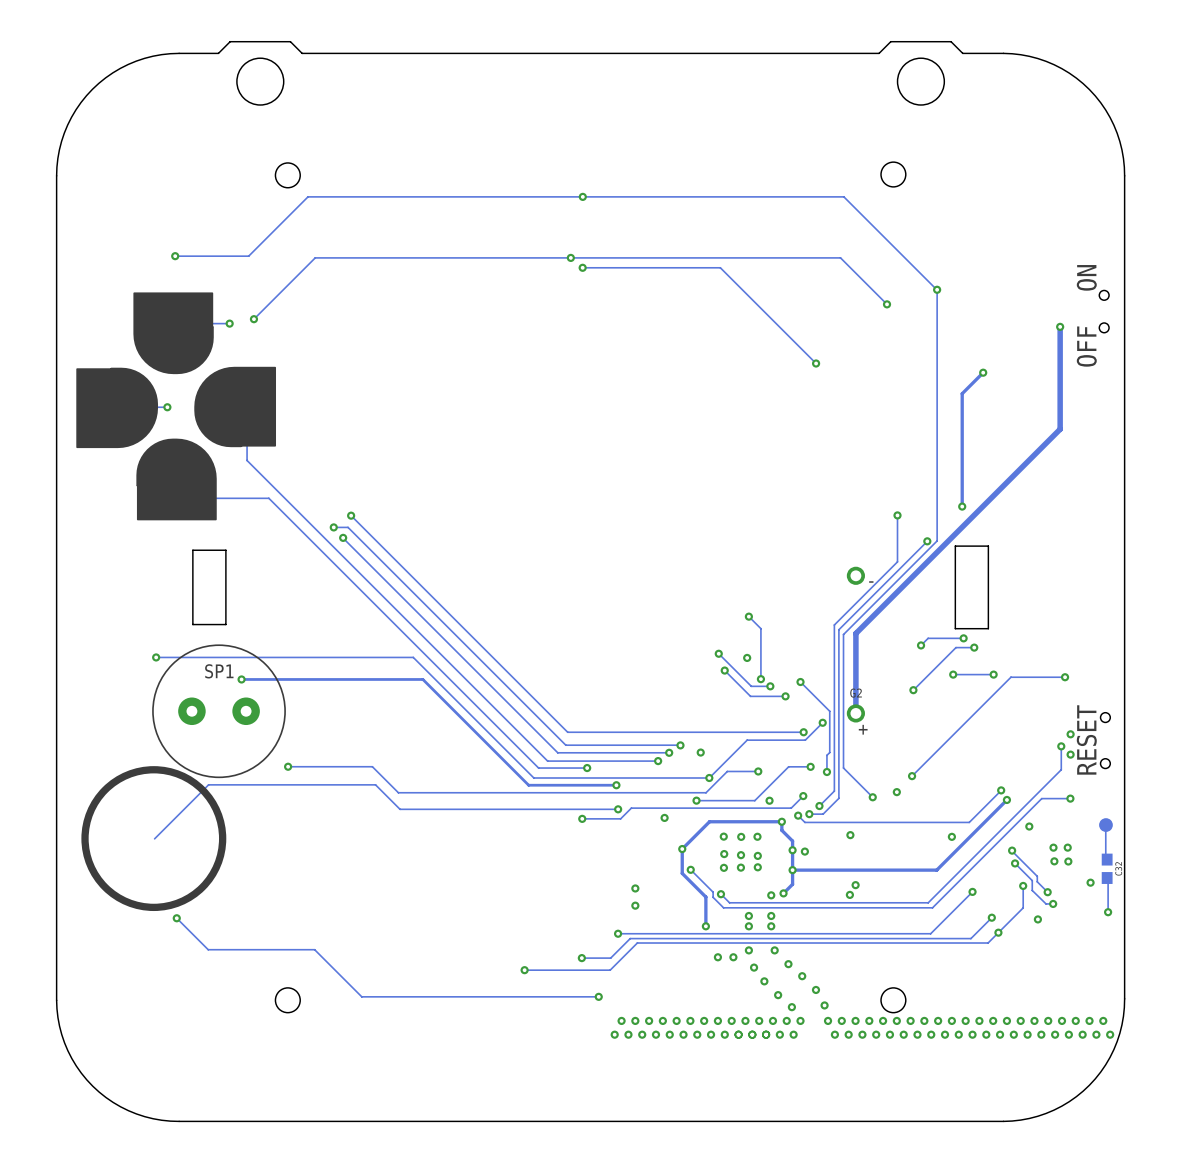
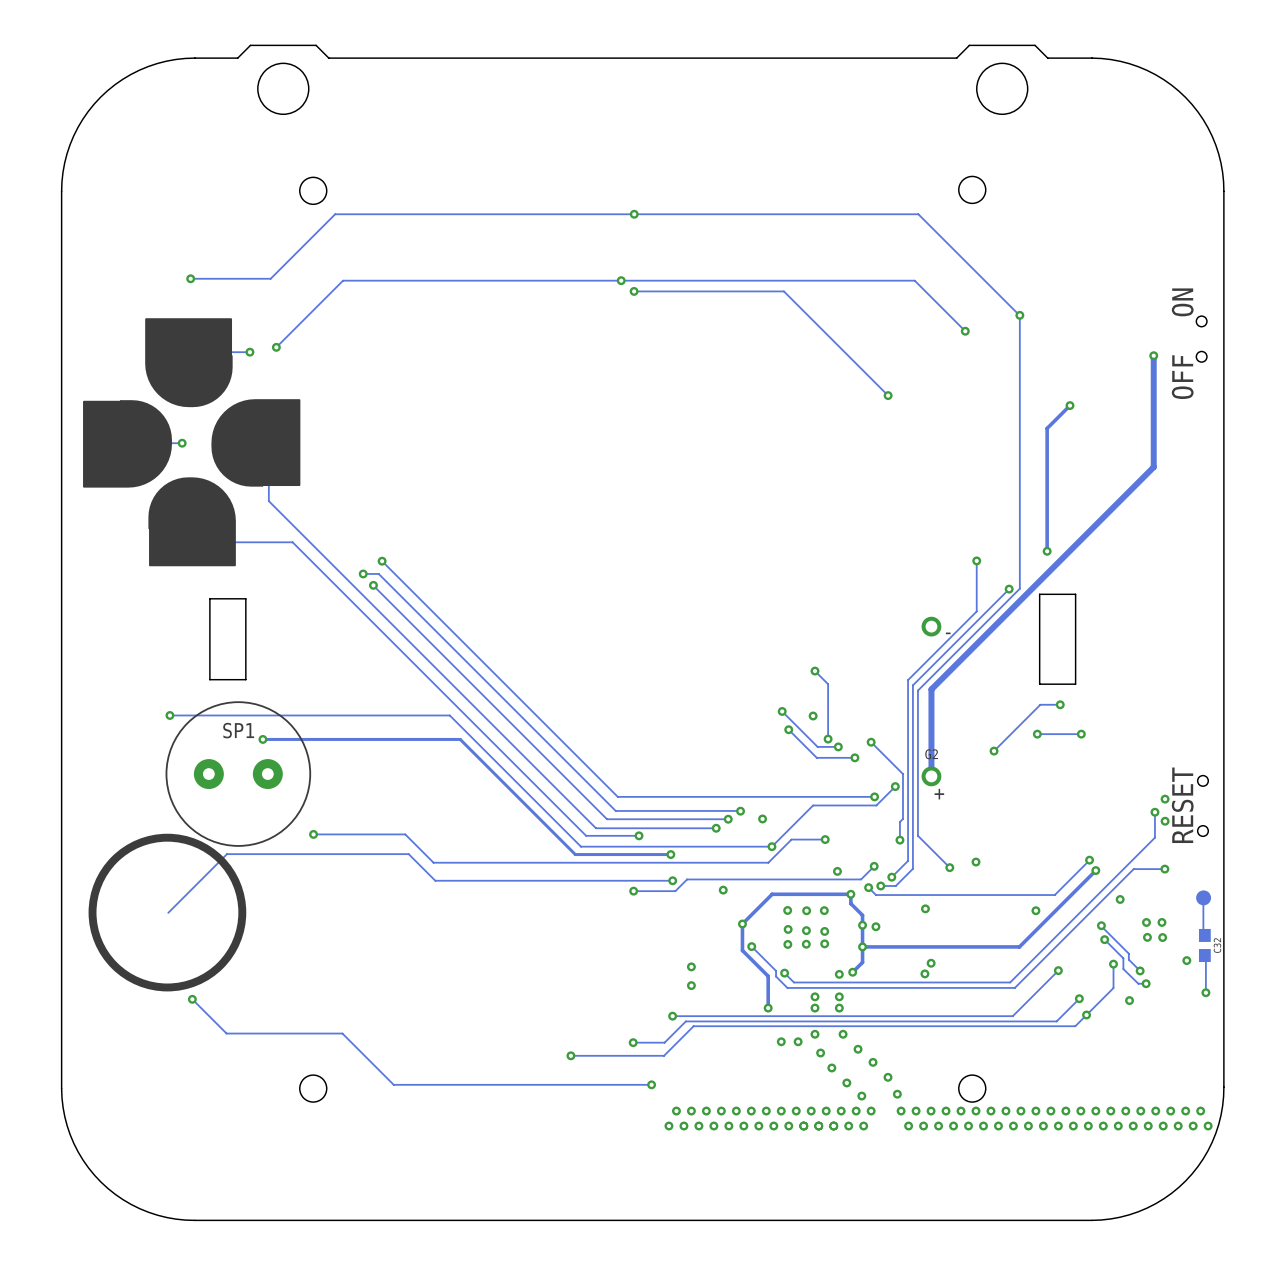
track: (963, 638) (928, 638) (921, 645) -> none
via: (963, 638) -> none
via: (921, 645) -> none
track: (1065, 677) (1010, 677) (912, 776) -> none
via: (1065, 677) -> none
track: (810, 766) (788, 766) (754, 800) (696, 800) -> none
via: (810, 766) -> none
via: (912, 776) -> none
via: (696, 800) -> none

